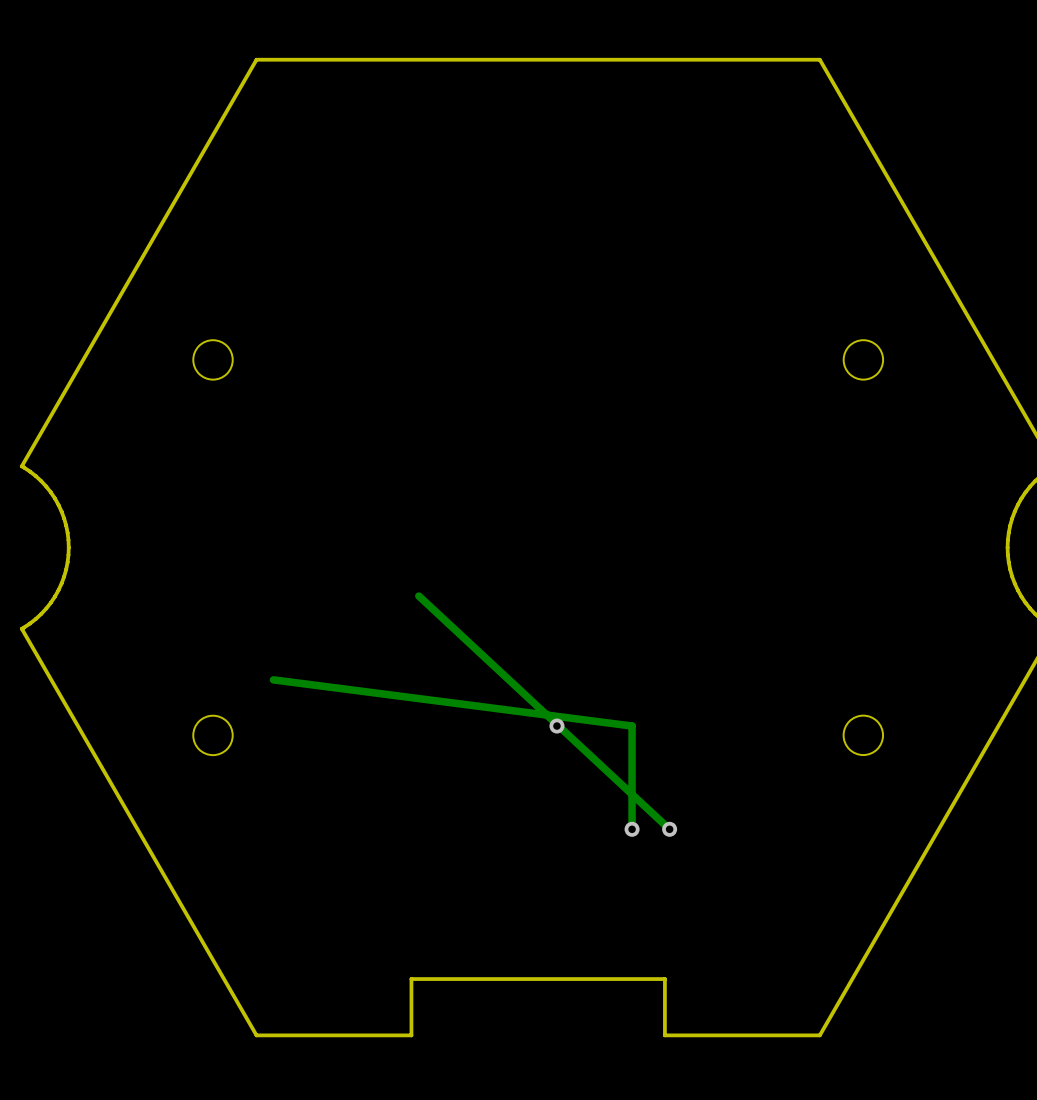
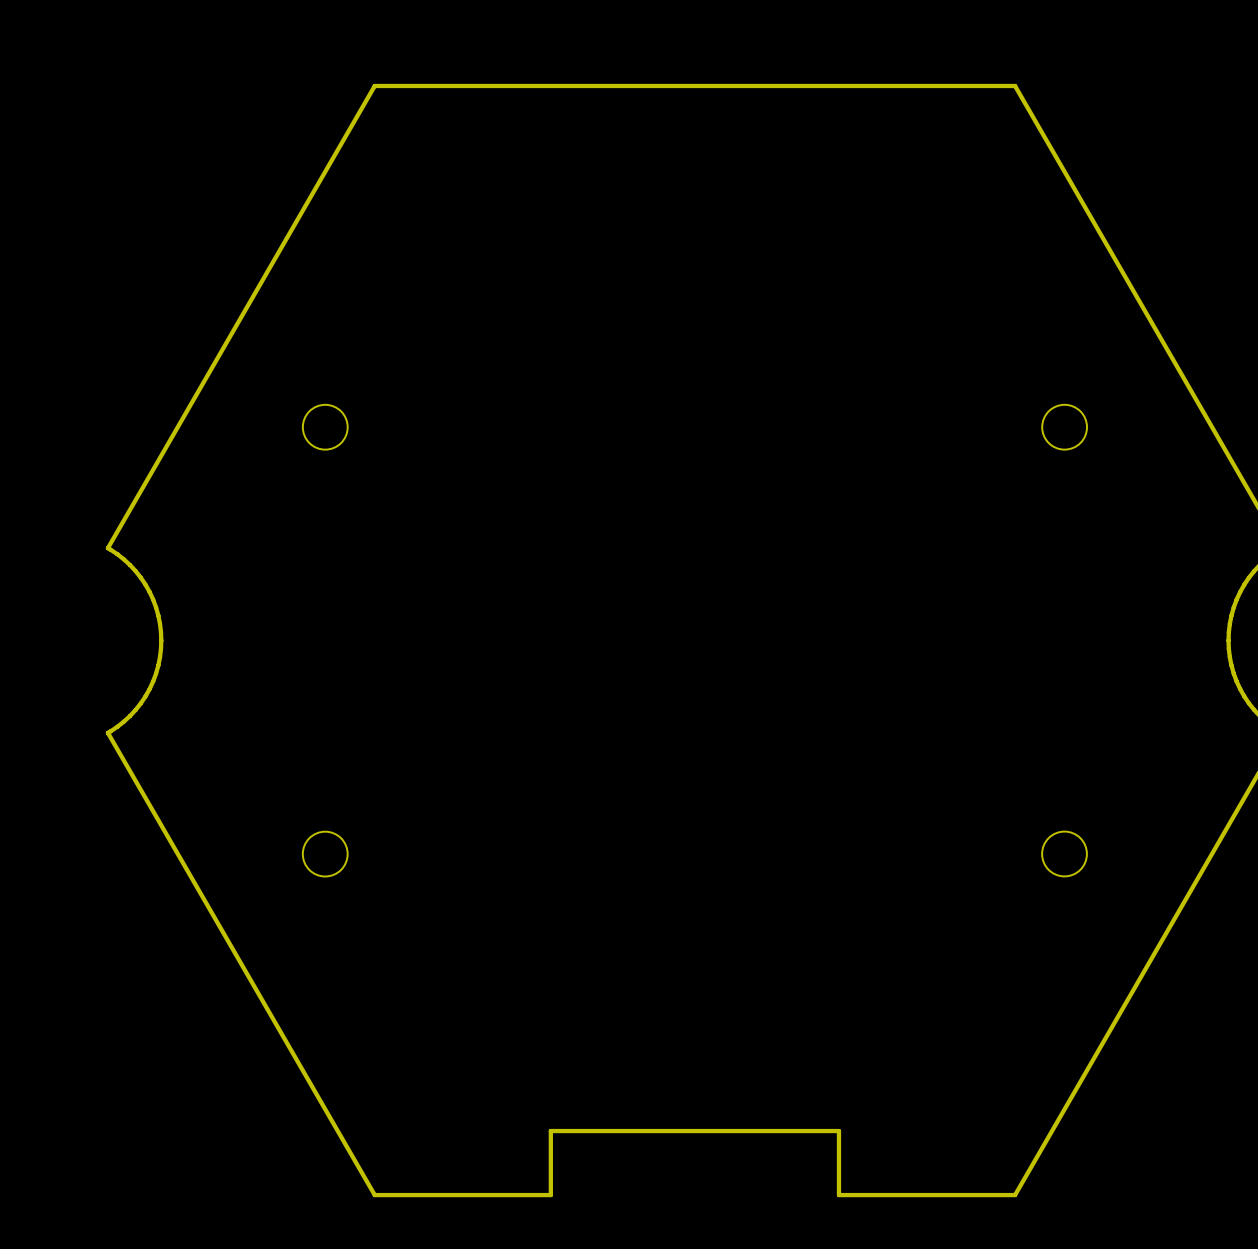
track: (418, 596) (669, 829) -> none
track: (273, 679) (632, 726) (632, 829) -> none
via: (556, 726) -> none
via: (632, 829) -> none
via: (669, 829) -> none

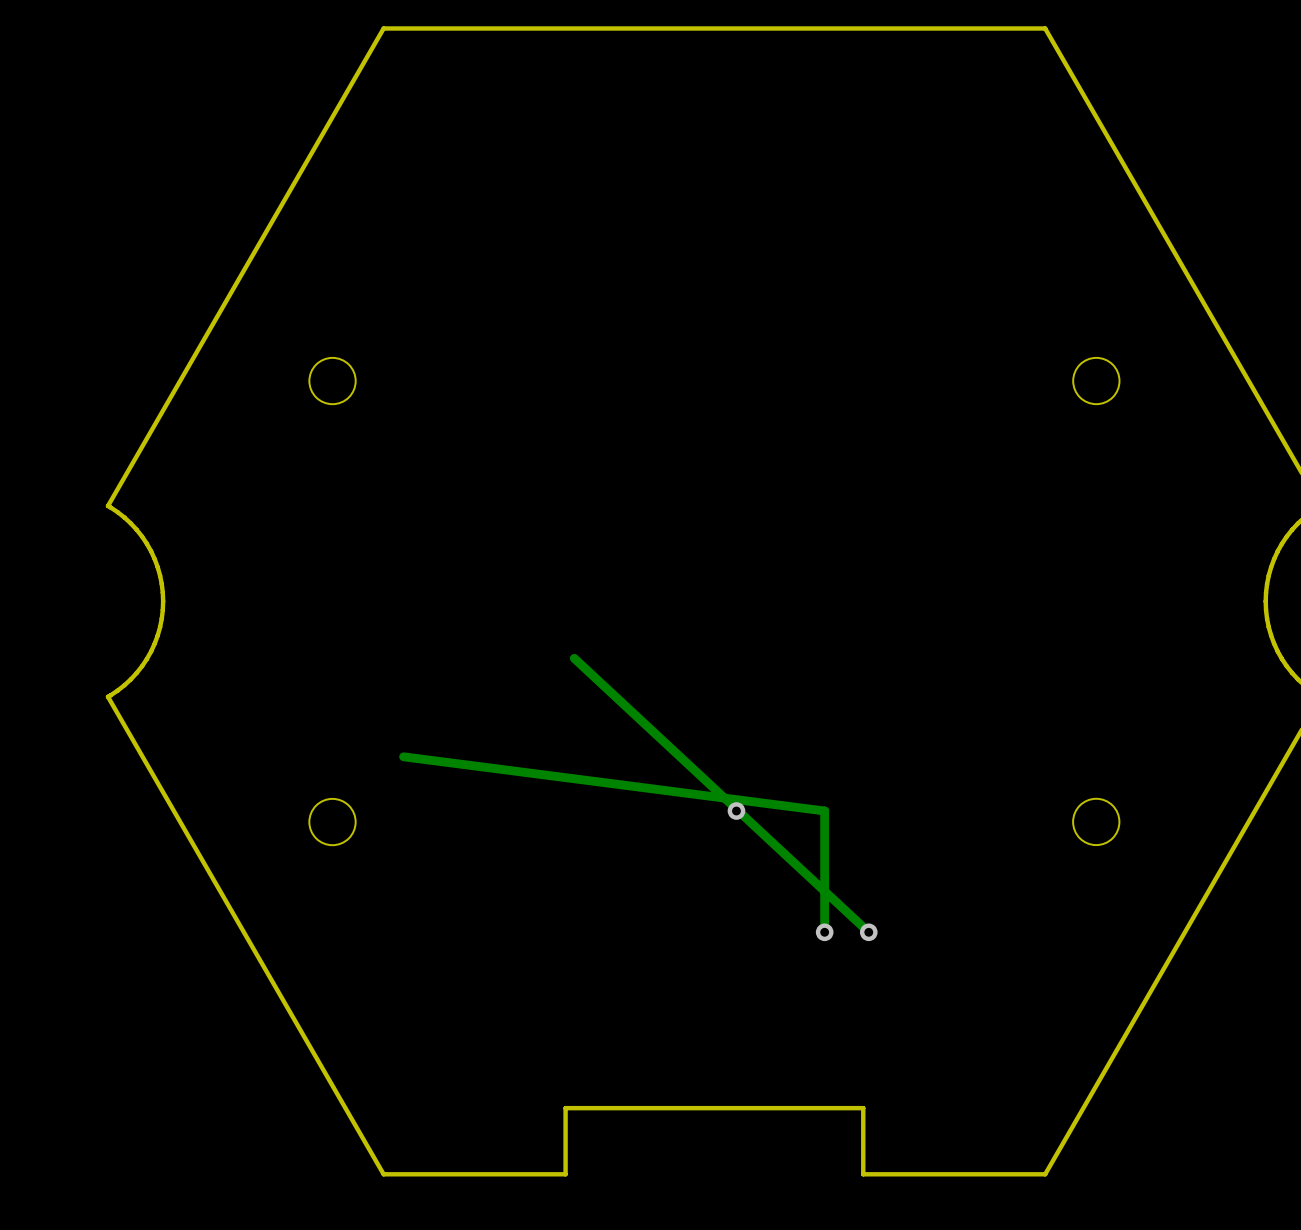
track: none -> (574, 658) (868, 932)
track: none -> (403, 756) (824, 811) (824, 932)
via: none -> (736, 811)
via: none -> (824, 932)
via: none -> (868, 932)

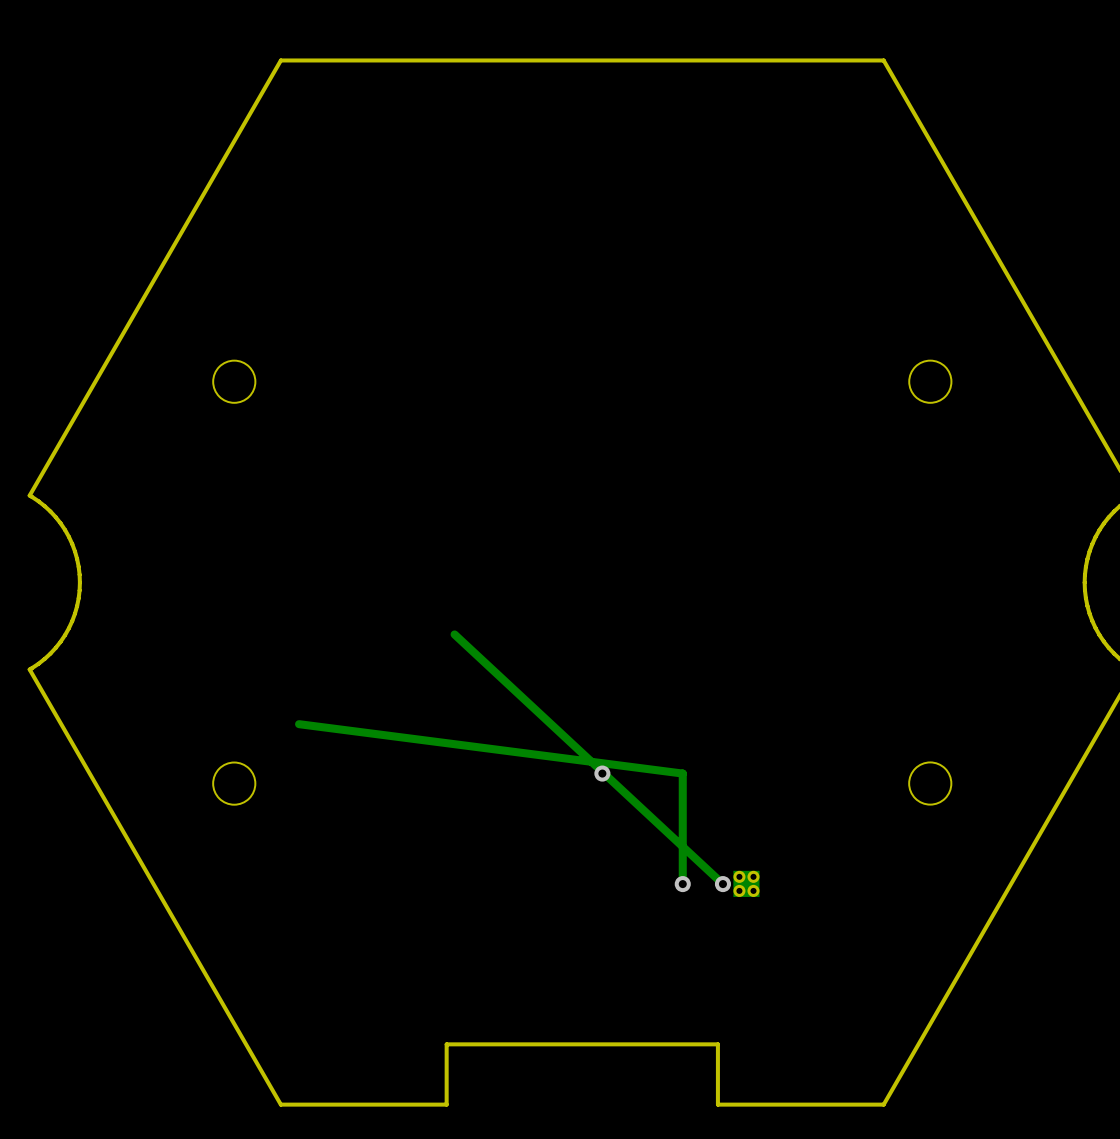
part: none -> (746, 883)

